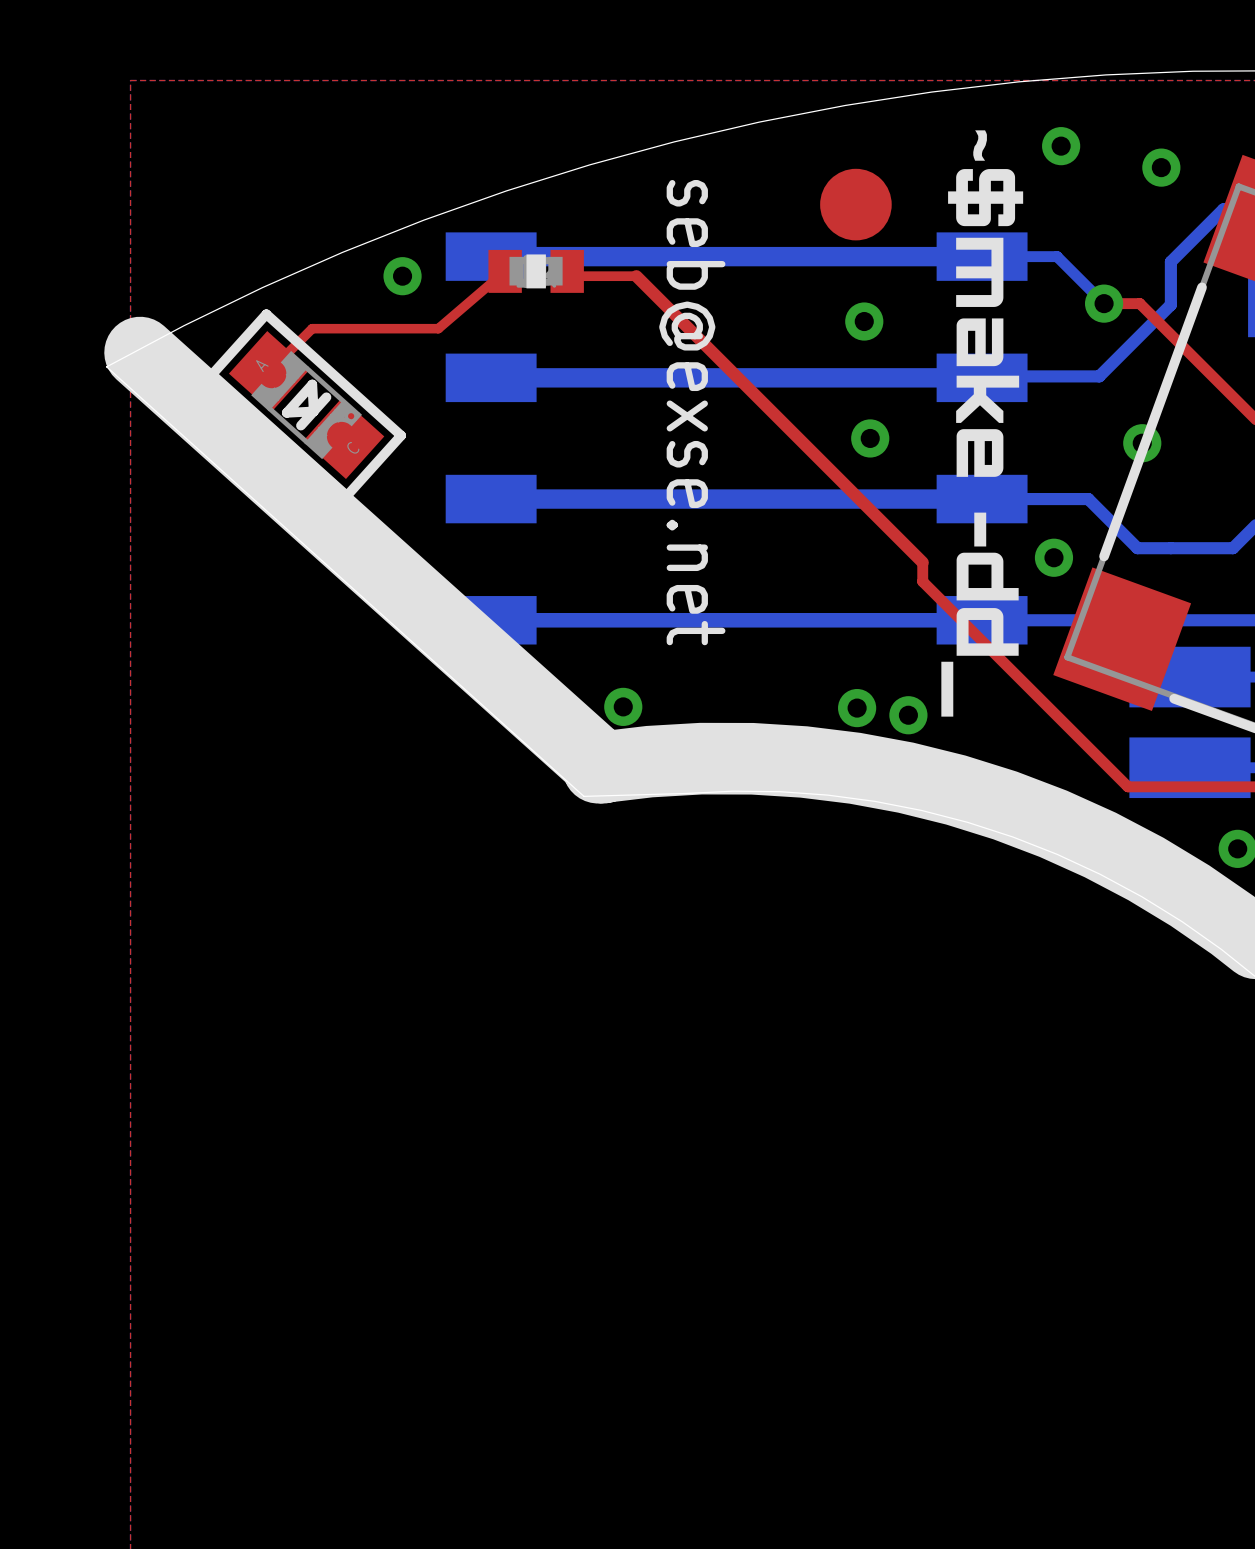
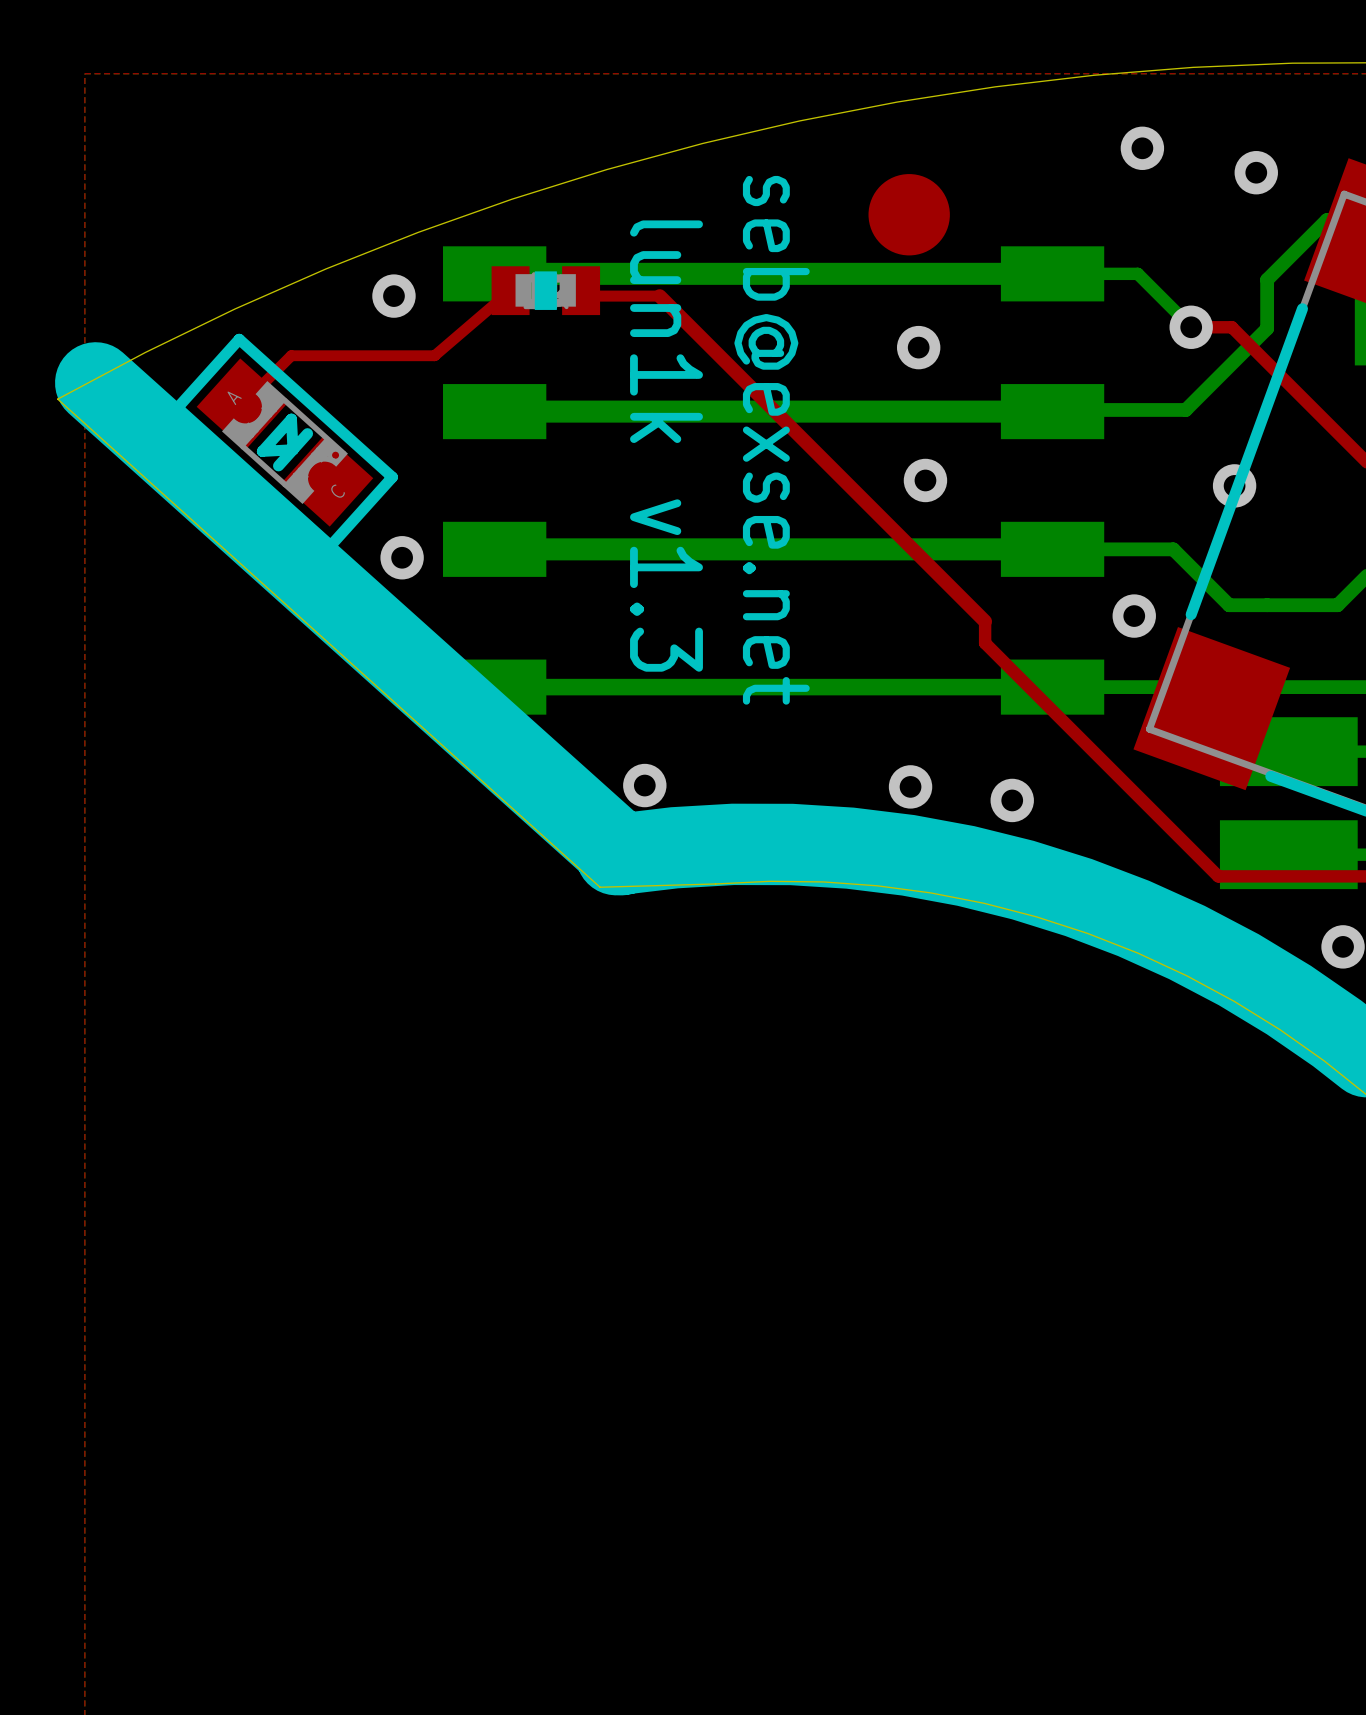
drawing: [941, 130, 1024, 717] -> none
text: none -> lun1k v1.3 (666, 446)
text position: seb@exse.net (692, 412) -> seb@exse.net (772, 440)
via: none -> (402, 557)
via position: (908, 715) -> (1012, 800)

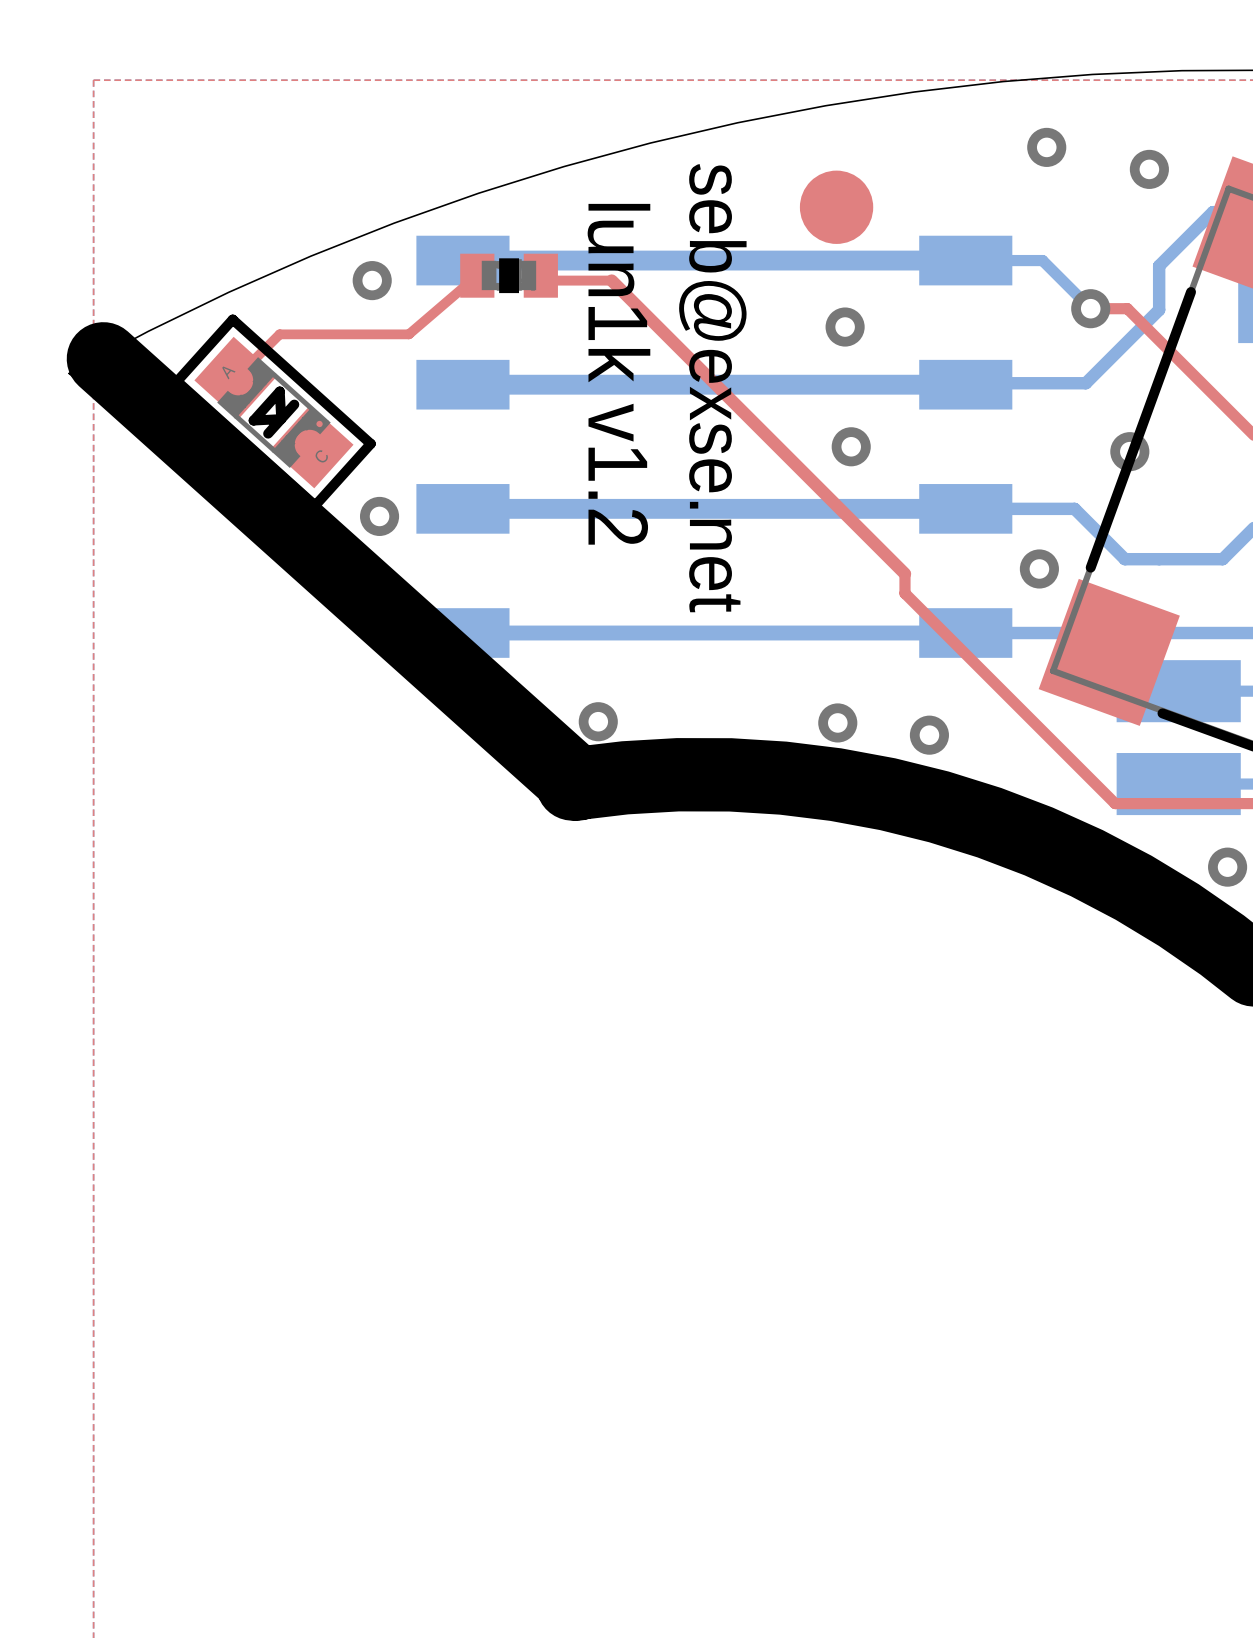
text: lun1k v1.3 (666, 446) -> lun1k v1.2 (618, 374)

